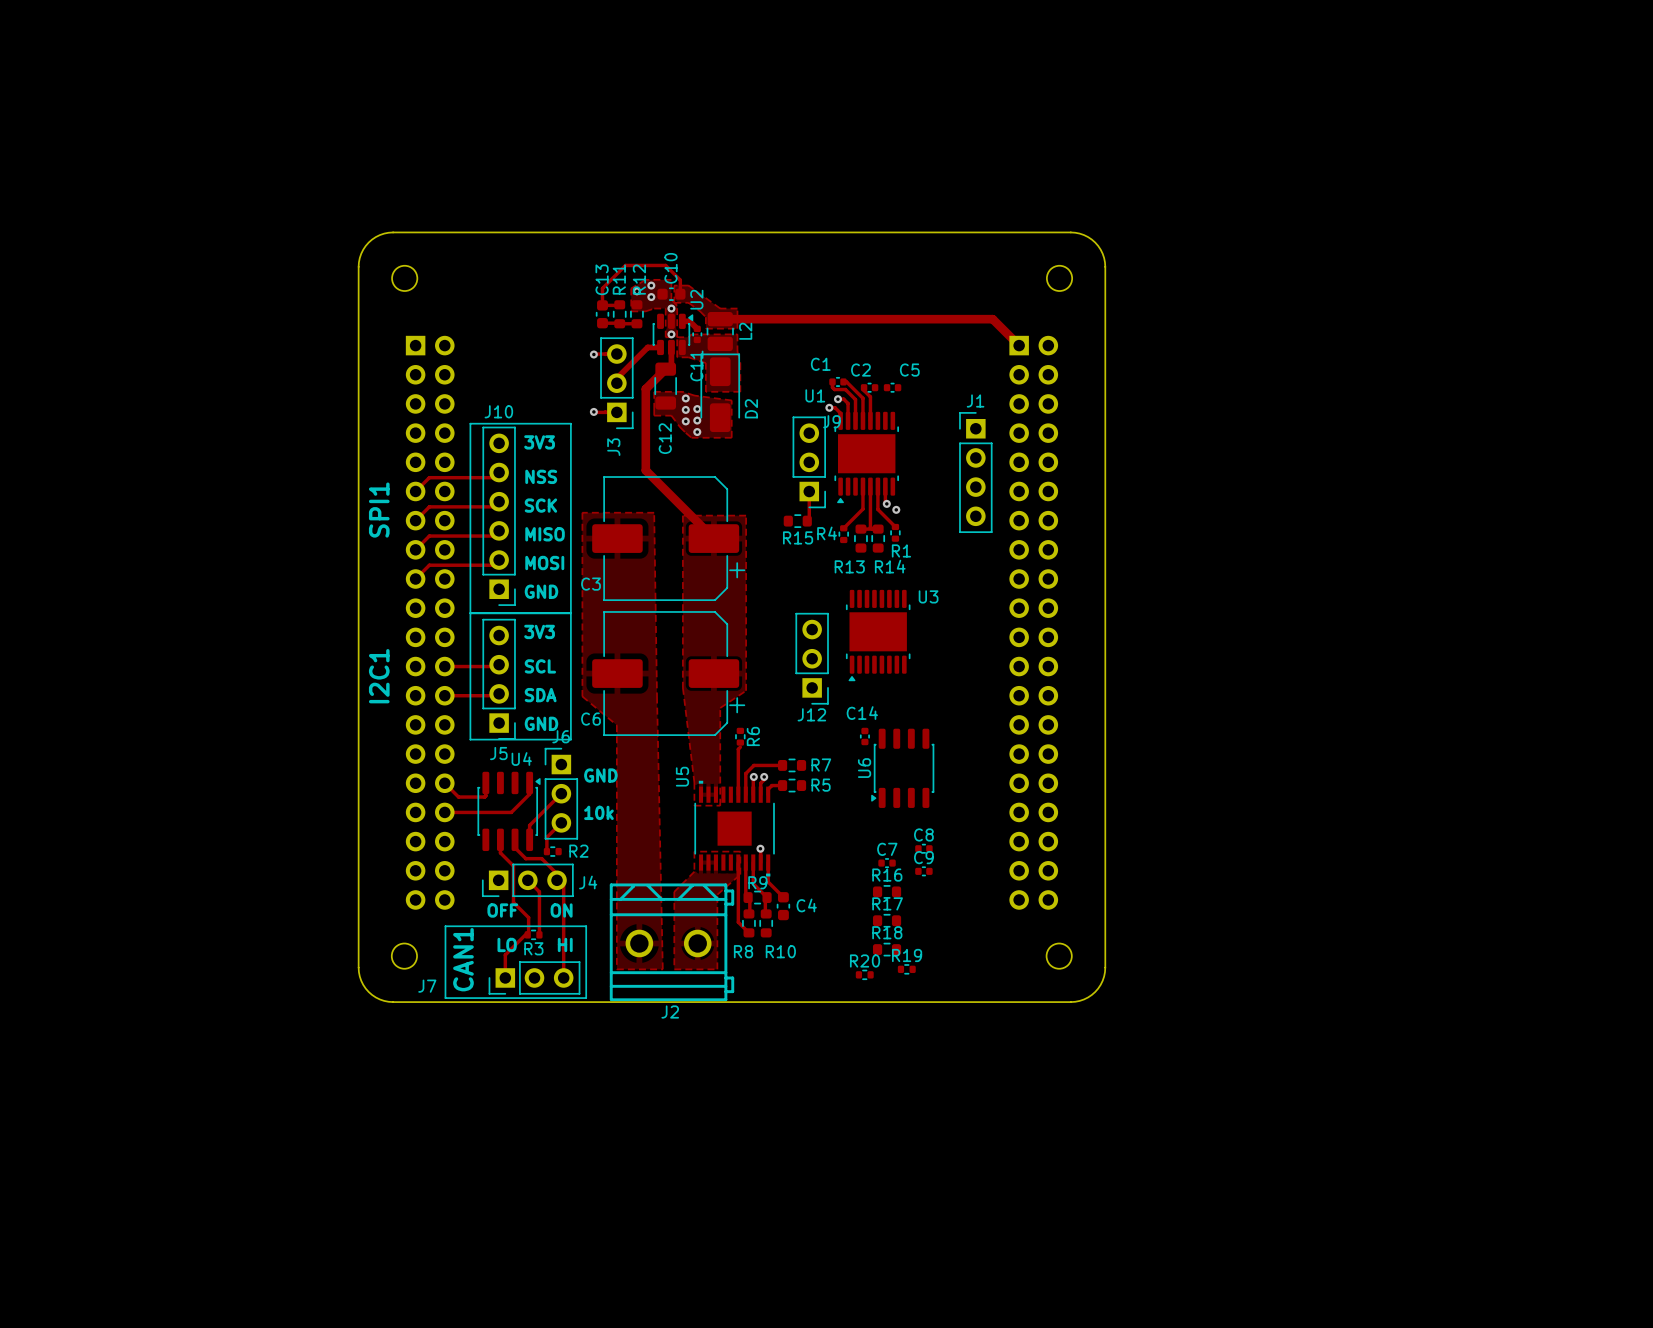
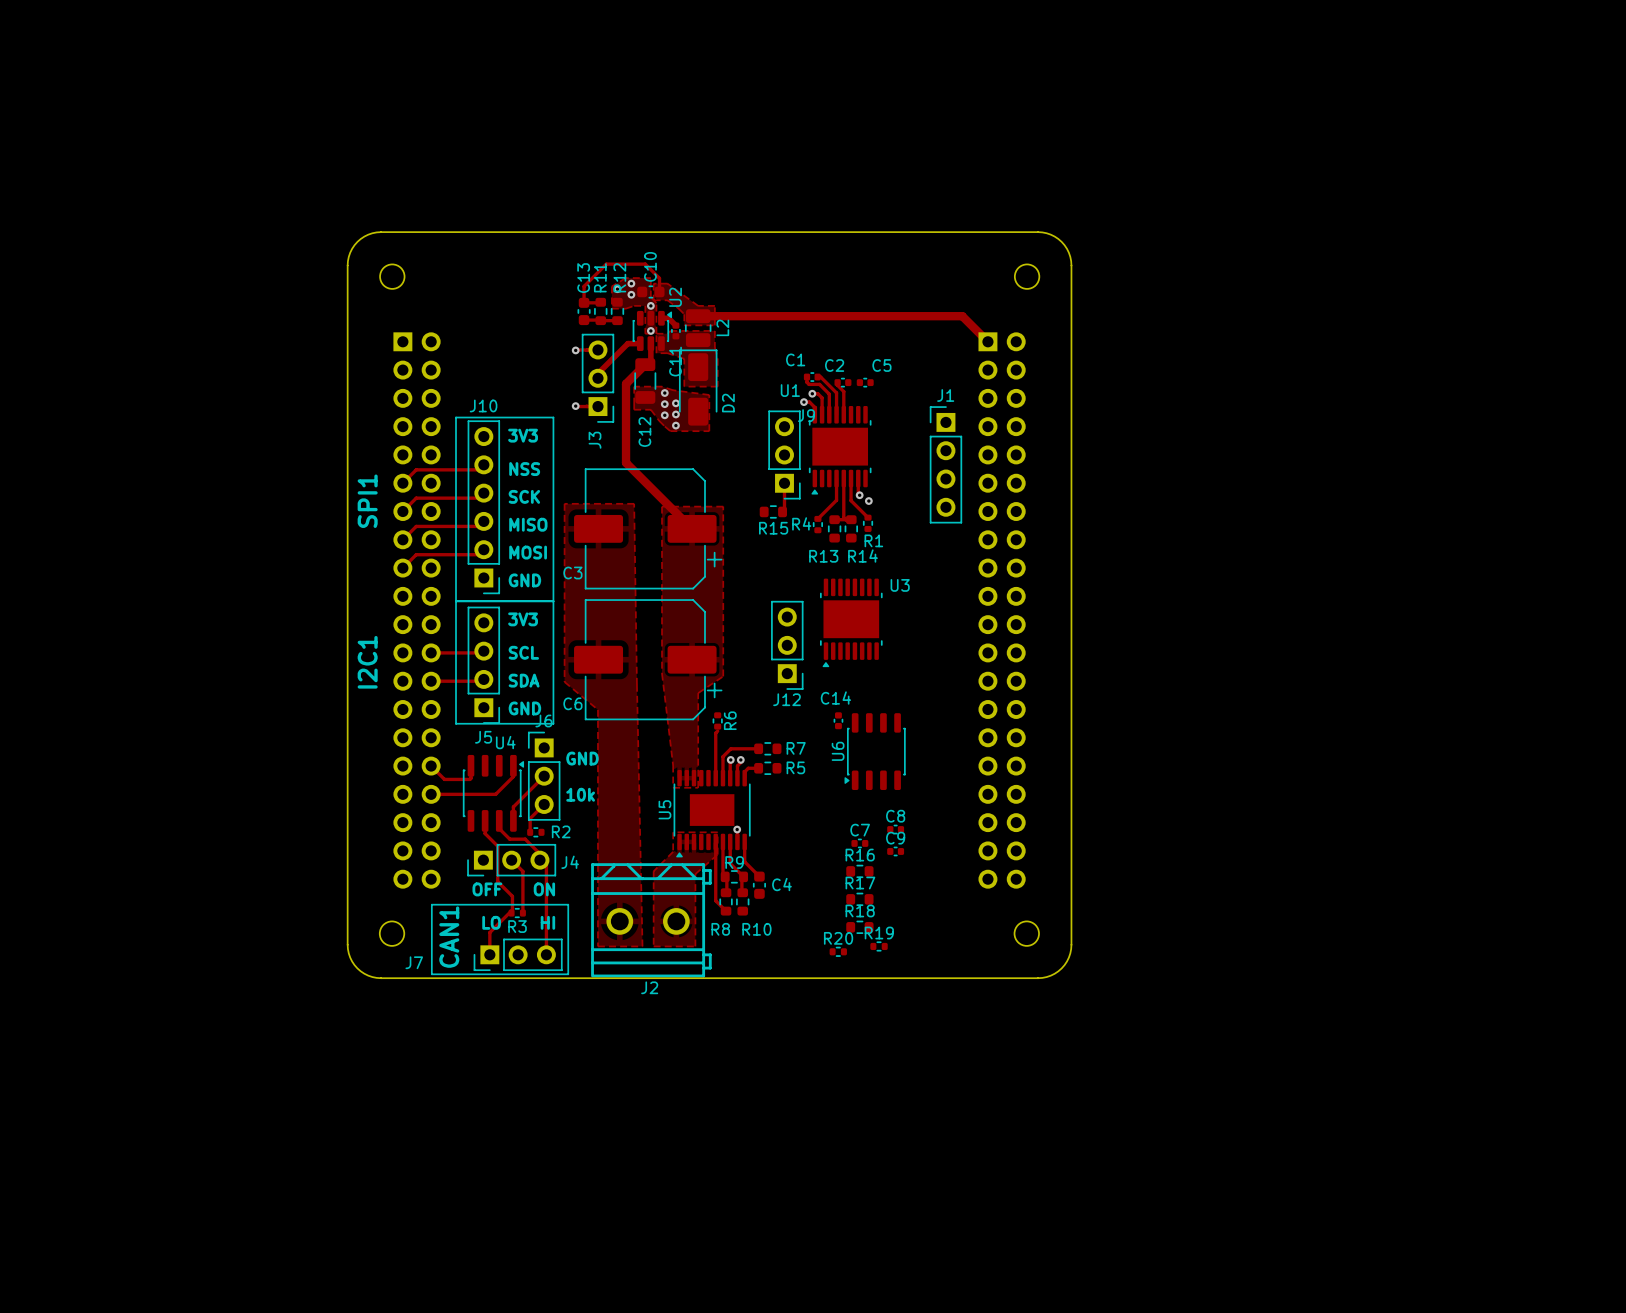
U5 name position: U5 (682, 776) -> U5 (664, 809)
U5 footprint: [694, 780, 775, 877] -> [673, 769, 751, 858]

